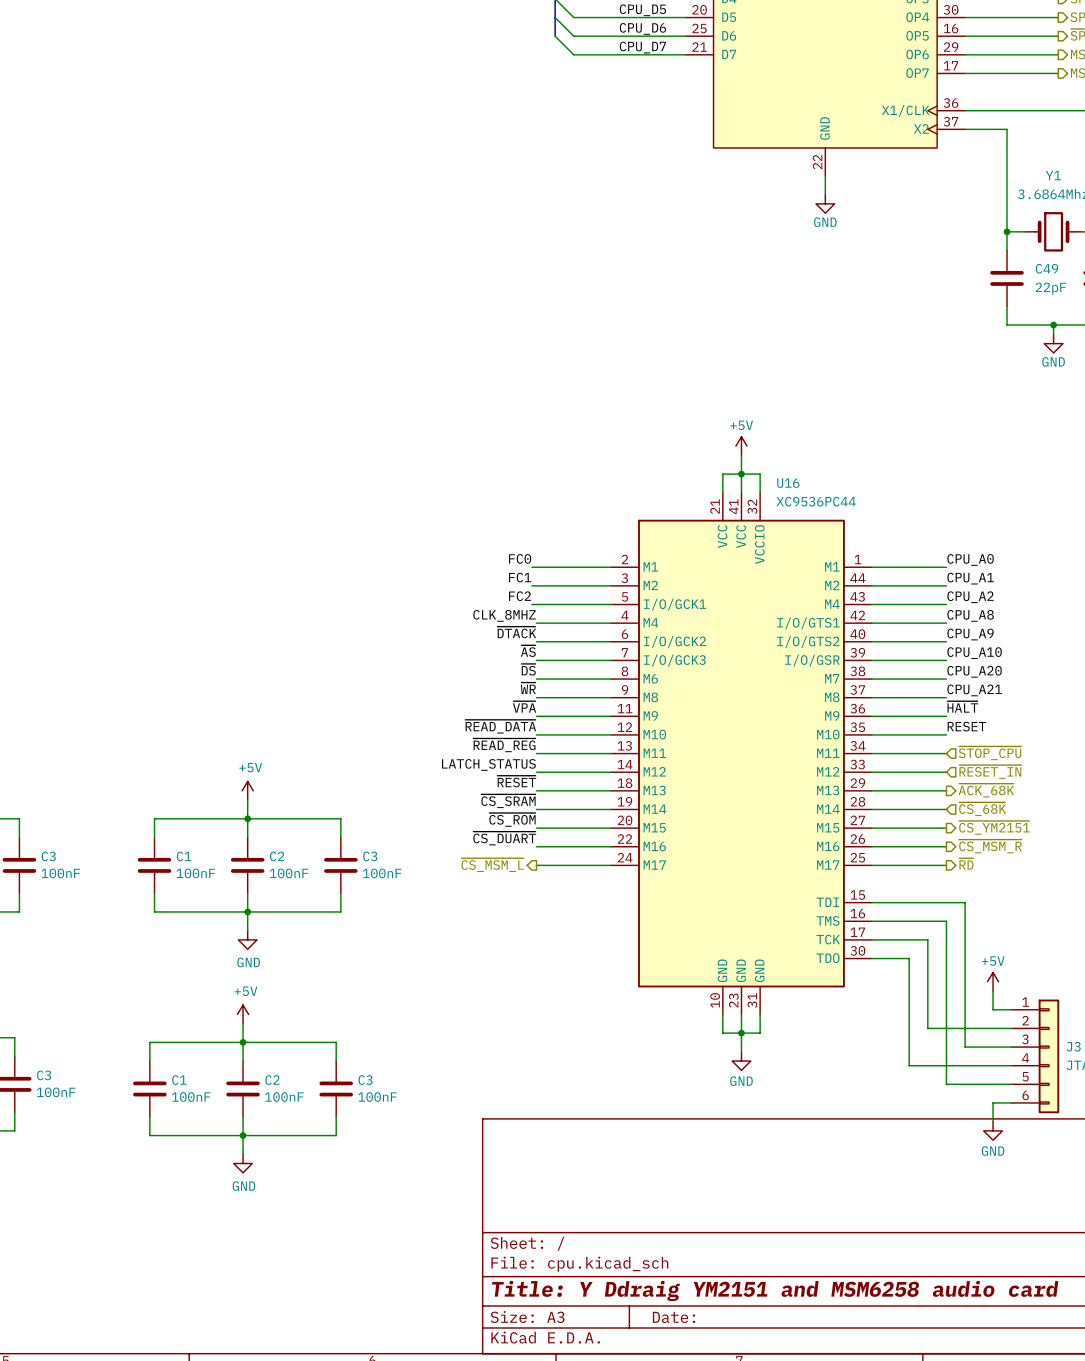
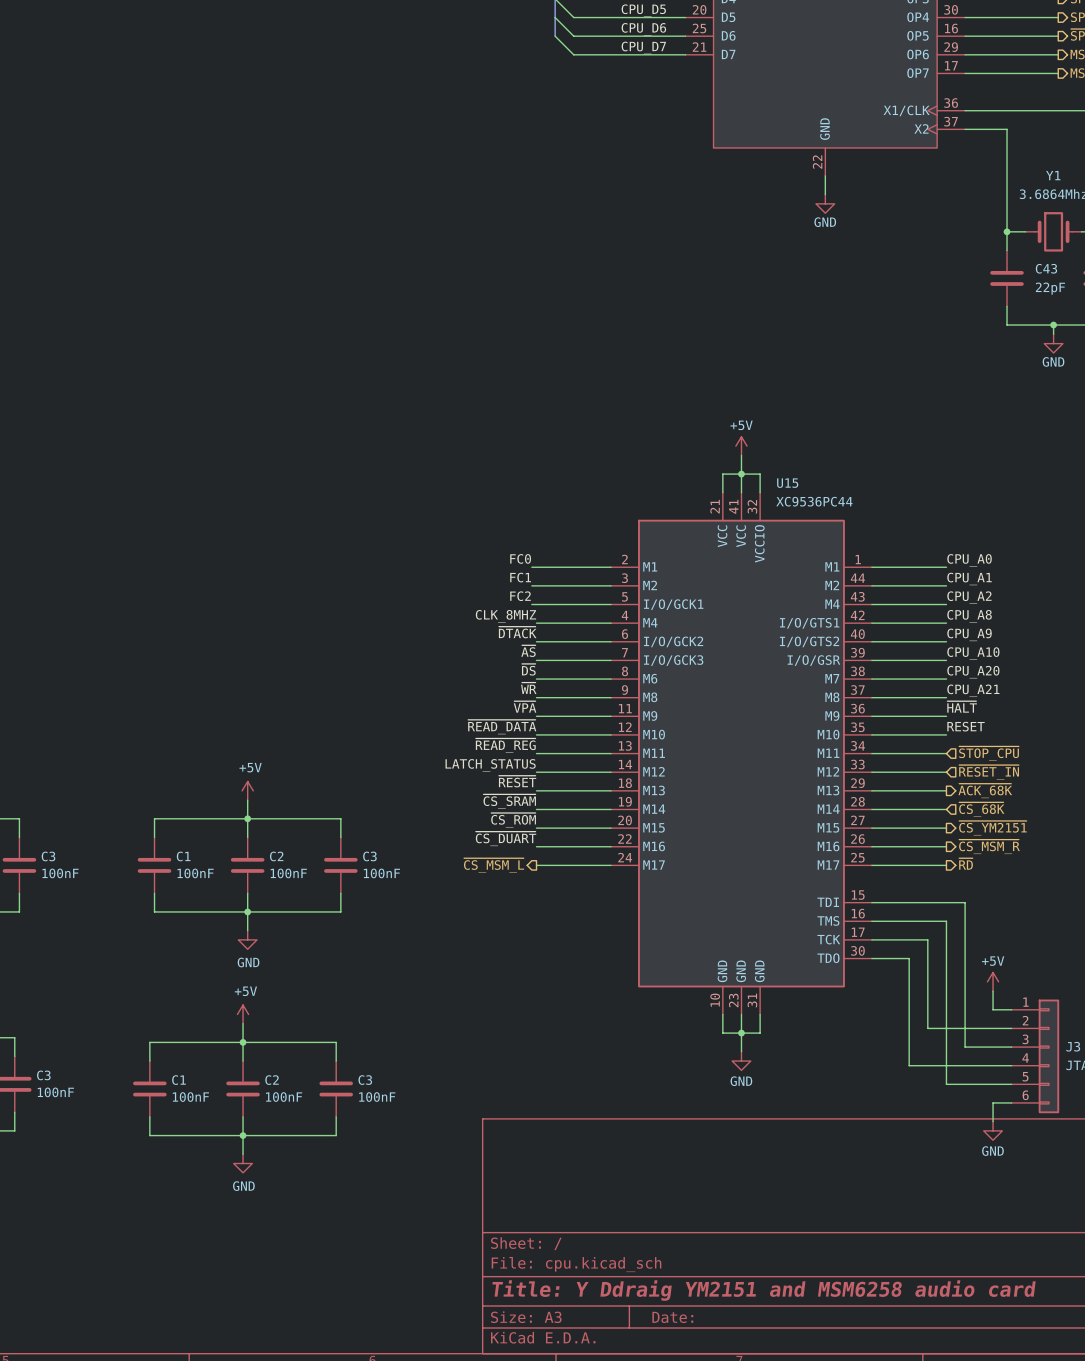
C49 name: C49 (1047, 268) -> C43 (1046, 268)
U16 name: U16 (788, 483) -> U15 (787, 483)

